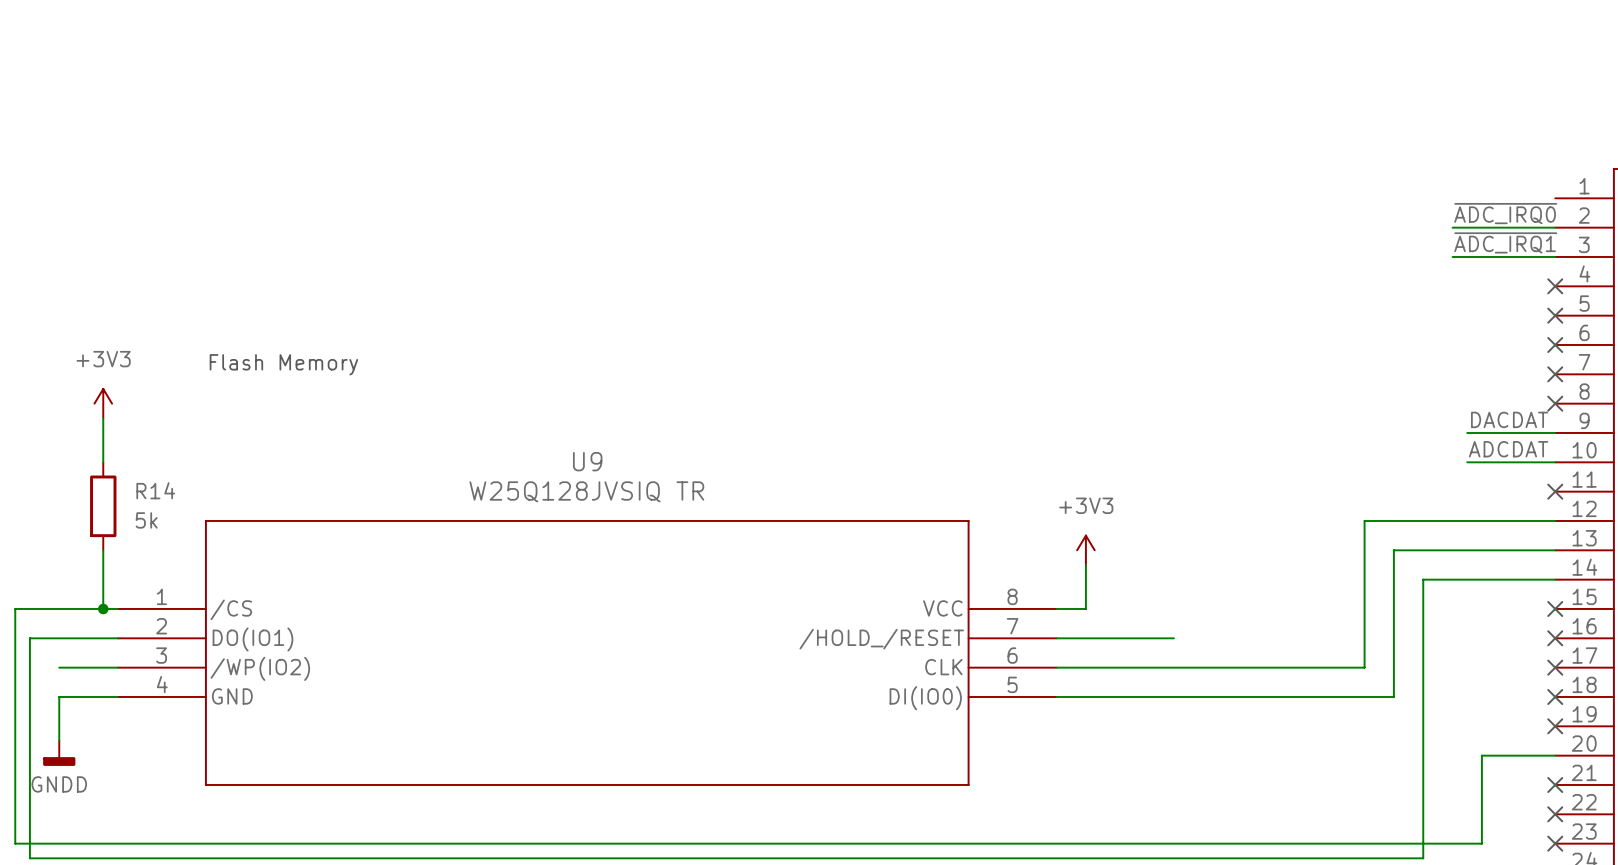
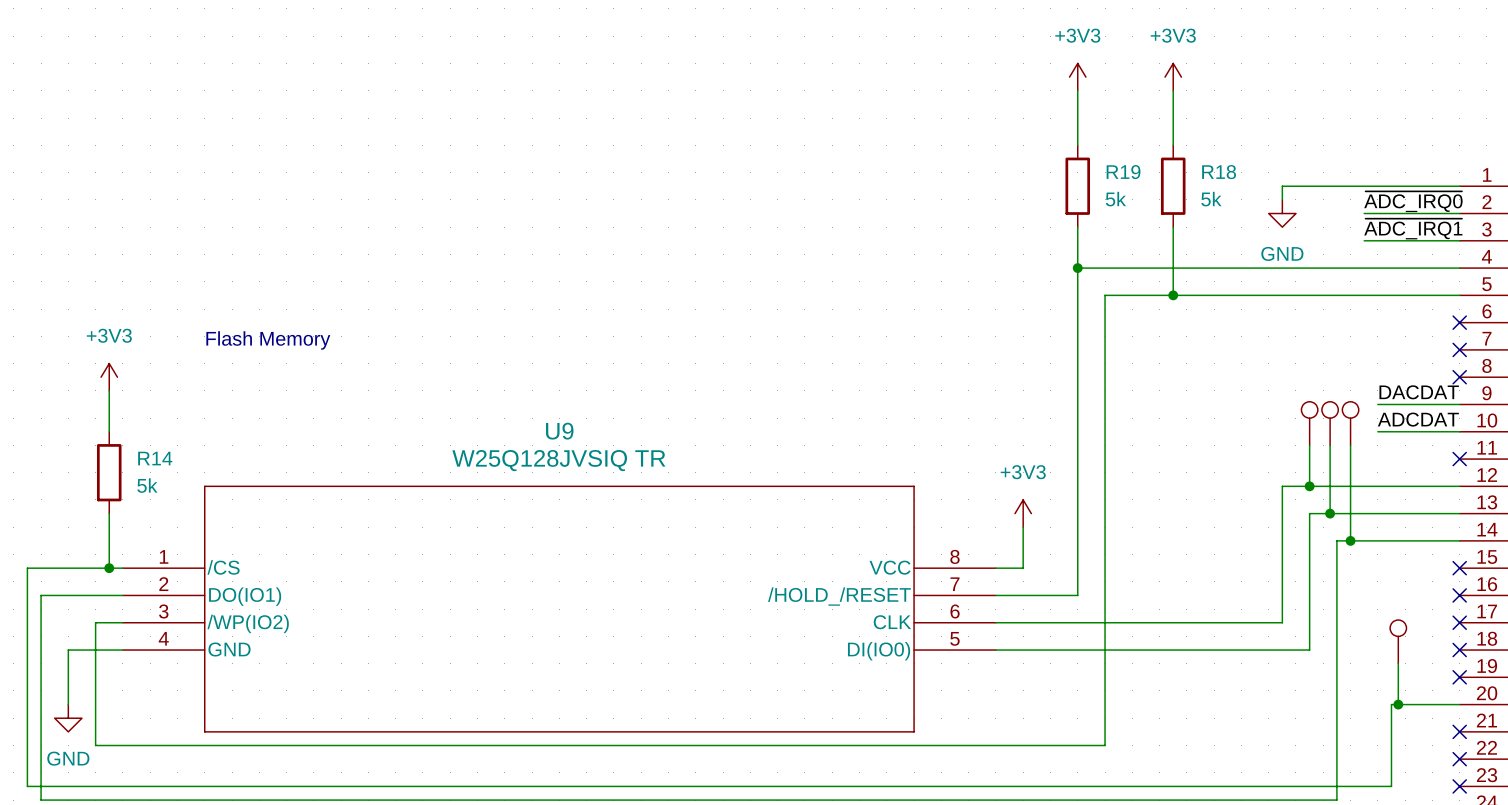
power symbol: none -> +3V3 (1077, 77)
power symbol: none -> +3V3 (1173, 77)
wire: none -> (1077, 90) (1077, 145)
wire: none -> (1173, 90) (1173, 145)
R19: none -> 5k (1077, 186)
R18: none -> 5k (1173, 186)
wire: none -> (1459, 186) (1282, 186) (1282, 199)
power symbol: none -> GND (1282, 213)
wire: none -> (1173, 227) (1173, 295)
wire: none -> (1077, 268) (1459, 268)
junction: none -> (1077, 268)
no-connect mark: (1555, 286) -> none
junction: none -> (1173, 295)
no-connect mark: (1555, 315) -> none
part: none -> (1309, 423)
part: none -> (1330, 423)
part: none -> (1350, 423)
wire: none -> (1309, 445) (1309, 486)
wire: none -> (1330, 445) (1330, 513)
wire: none -> (1350, 445) (1350, 540)
junction: none -> (1309, 486)
junction: none -> (1330, 513)
junction: none -> (1350, 540)
wire: (1144, 638) (1173, 638) -> (1077, 595) (1077, 227)
wire: (59, 667) (88, 667) -> (1459, 295) (1105, 295) (1105, 745) (95, 745) (95, 622)
part: none -> (1398, 641)
wire: none -> (1398, 663) (1398, 704)
power symbol: GNDD (59, 753) -> none
junction: none -> (1398, 704)
power symbol: none -> GND (68, 718)

